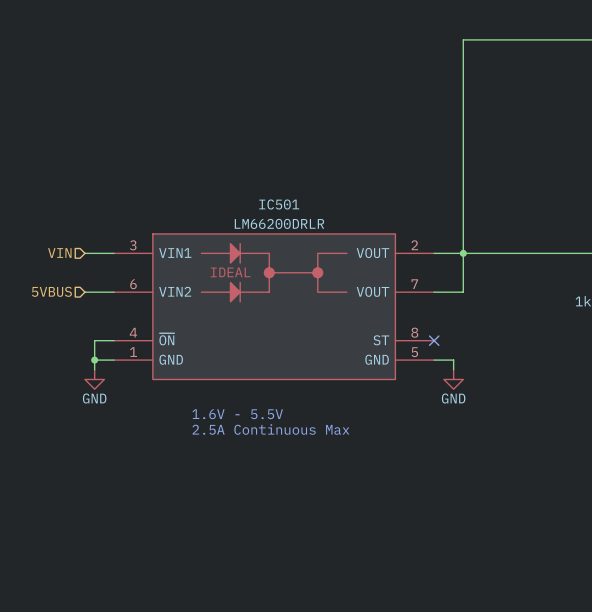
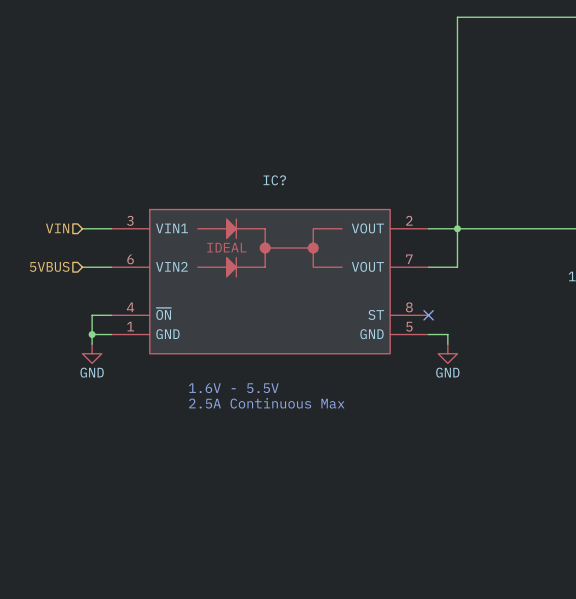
IC501 name: IC501 (279, 204) -> IC? (274, 180)
IC501 value: LM66200DRLR (279, 223) -> none

